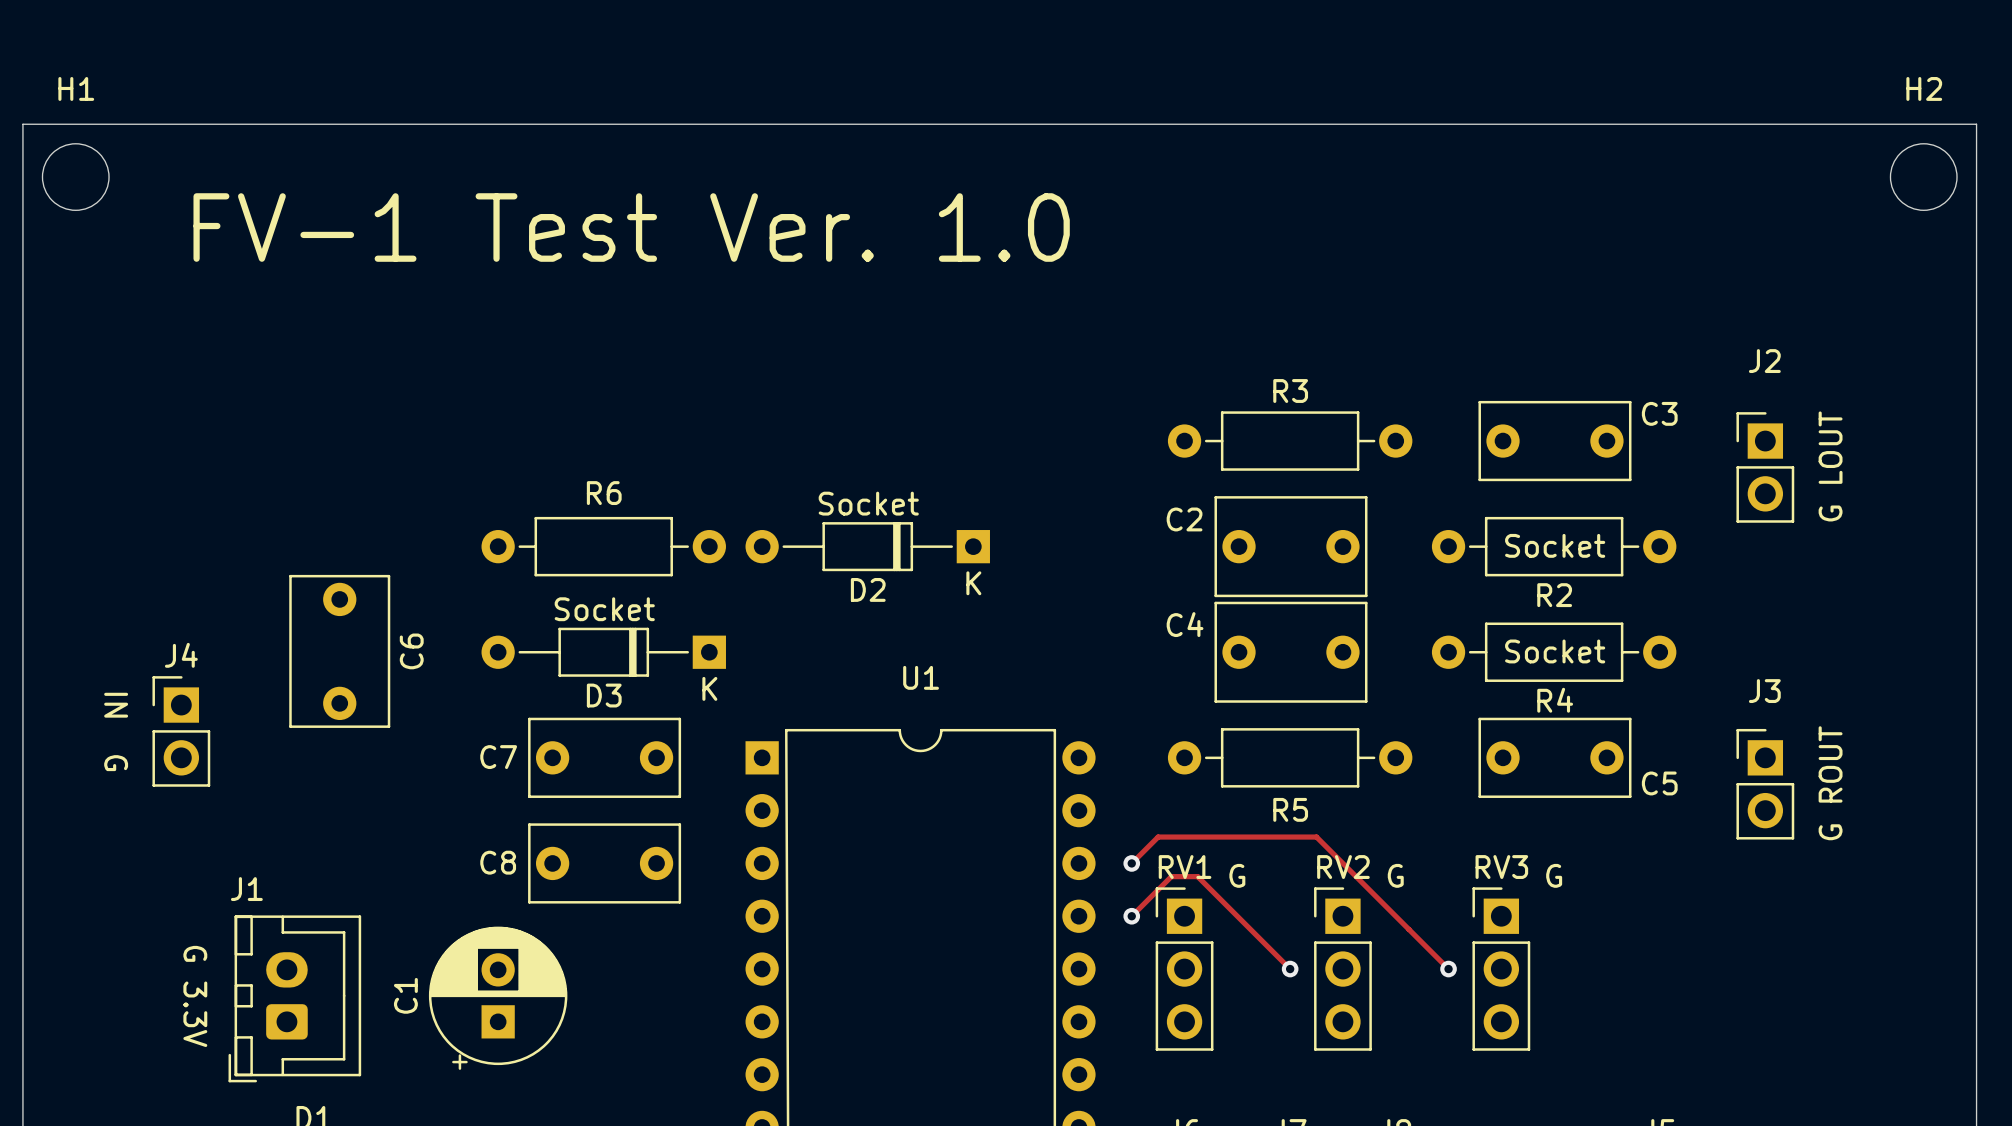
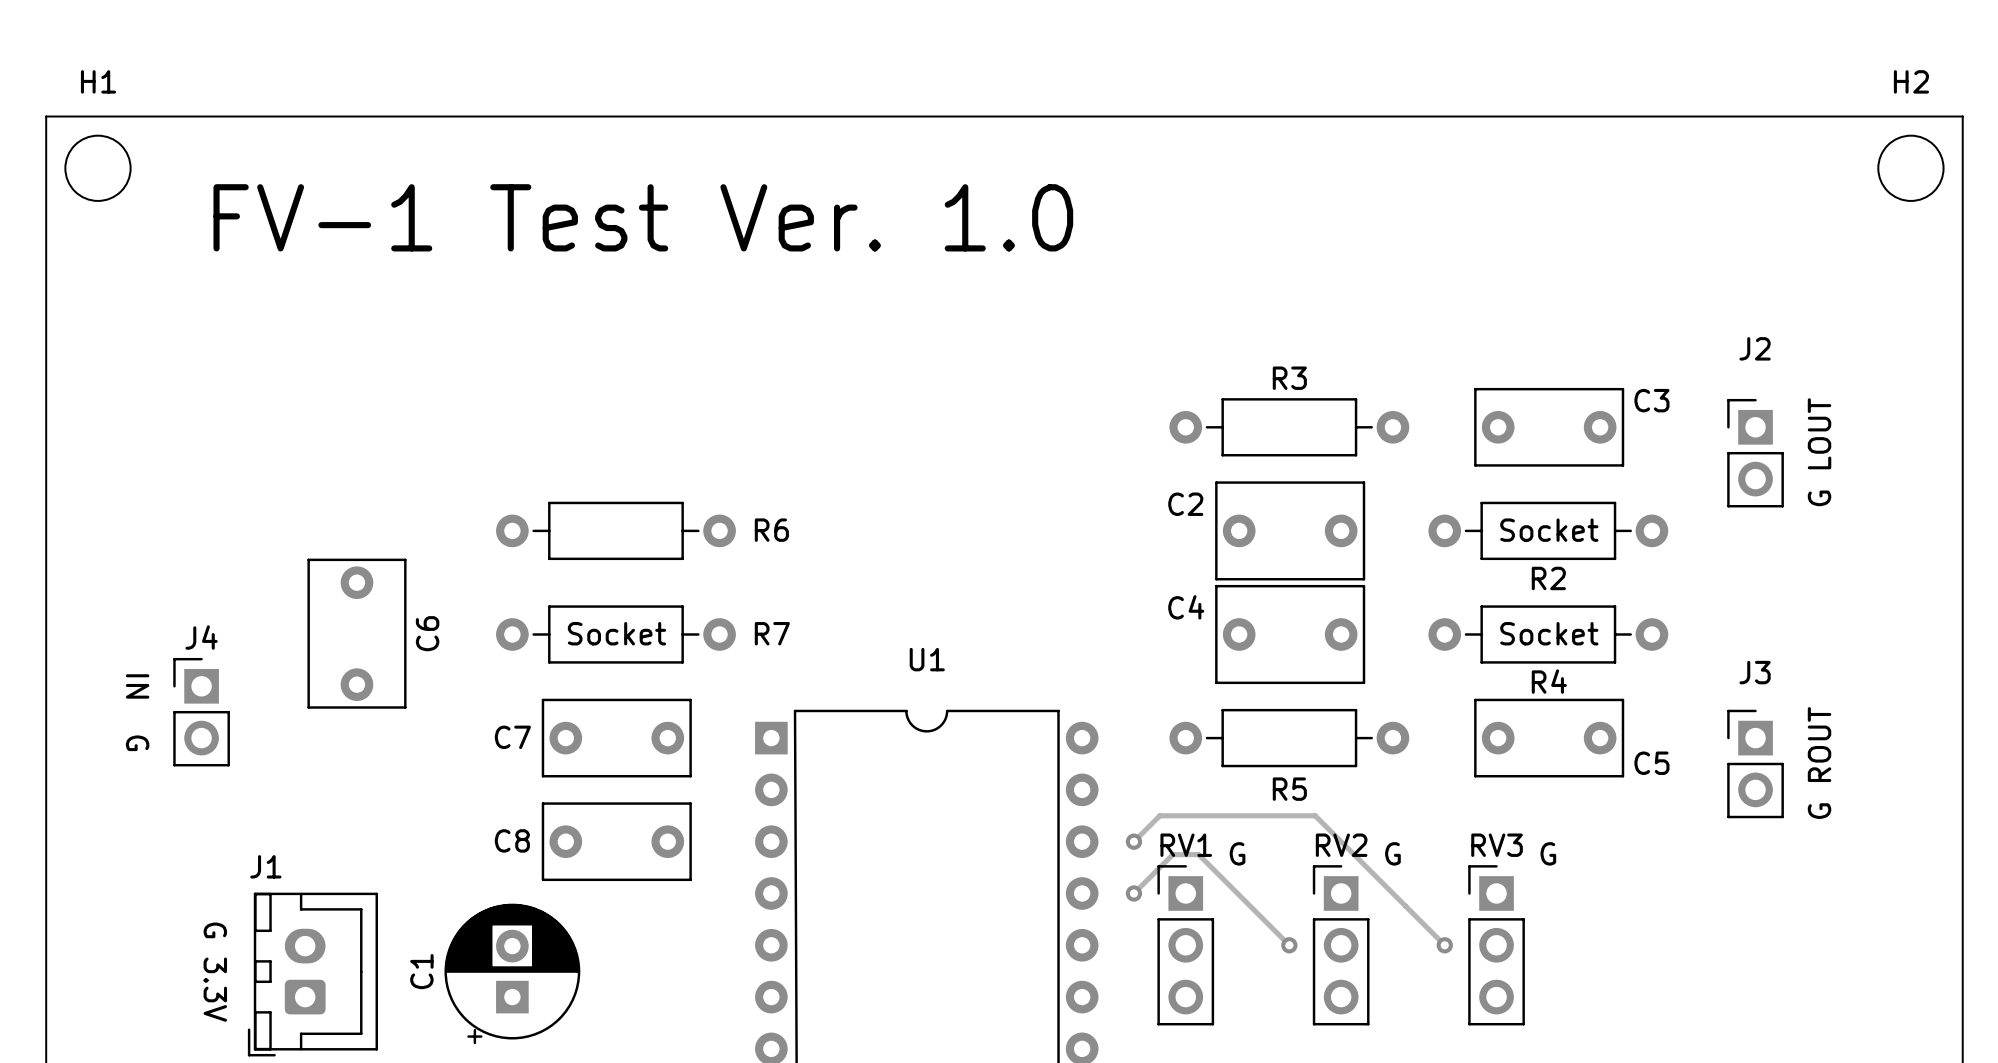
R6 name position: R6 (604, 493) -> R6 (771, 530)
text: Socket (868, 503) -> none
D2: (867, 546) -> none
text position: Socket (604, 609) -> Socket (616, 633)
D3: (603, 652) -> none
R7: none -> (615, 634)

